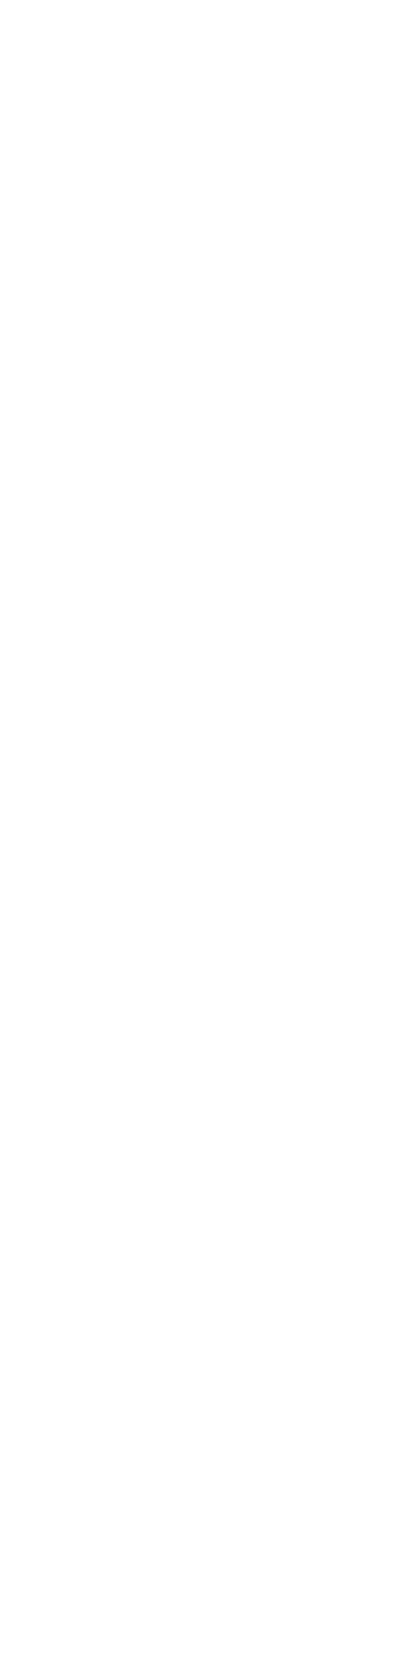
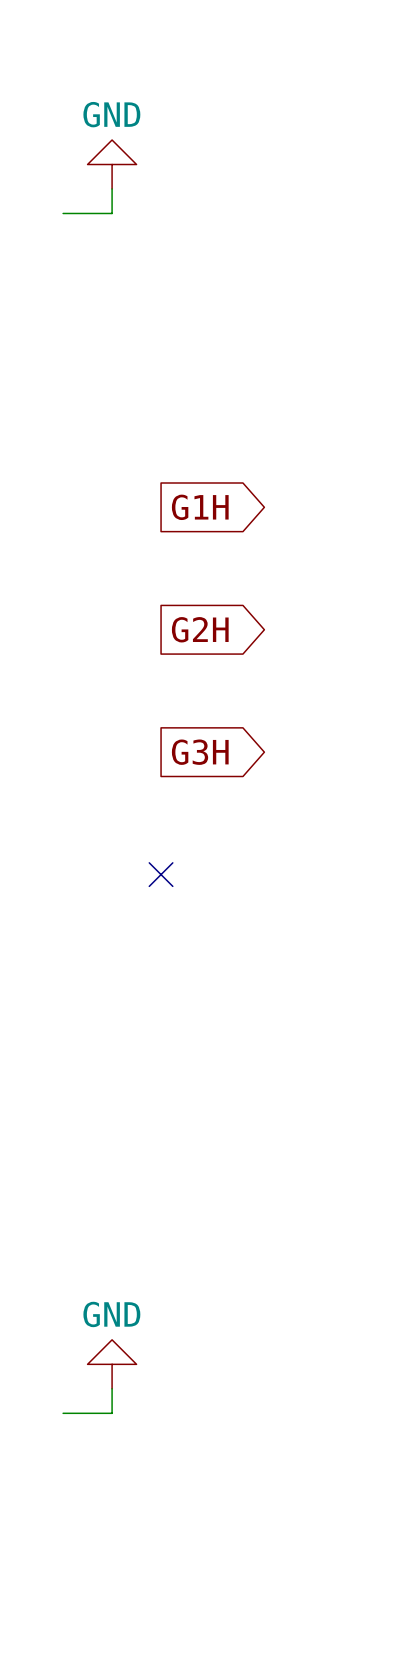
power symbol: none -> GND (112, 164)
wire: none -> (112, 188) (112, 213) (63, 213)
global label: none -> G1H (200, 507)
global label: none -> G2H (200, 629)
global label: none -> G3H (200, 752)
no-connect mark: none -> (161, 874)
power symbol: none -> GND (112, 1364)
wire: none -> (112, 1388) (112, 1413) (63, 1413)

